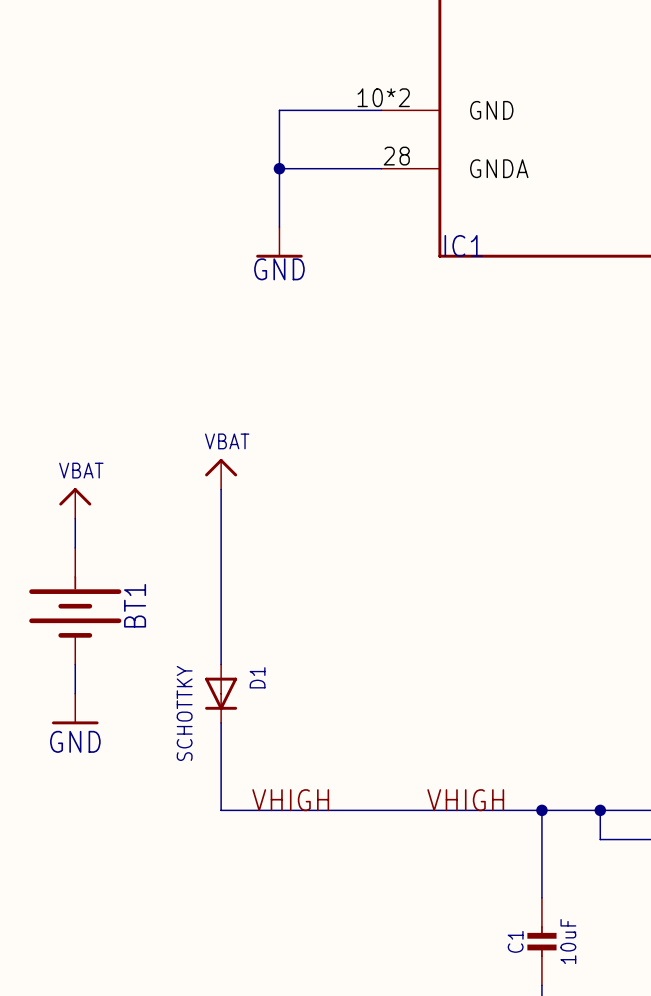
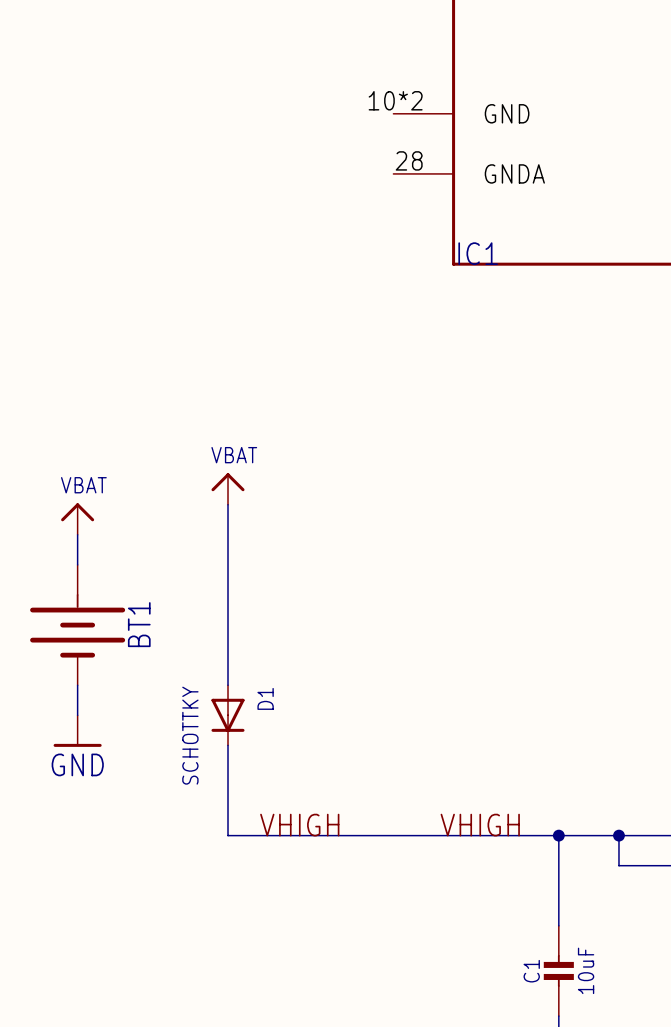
wire: (381, 110) (279, 110) (279, 227) -> none
wire: (279, 168) (381, 168) -> none
junction: (279, 168) -> none
power symbol: GND (279, 242) -> none

